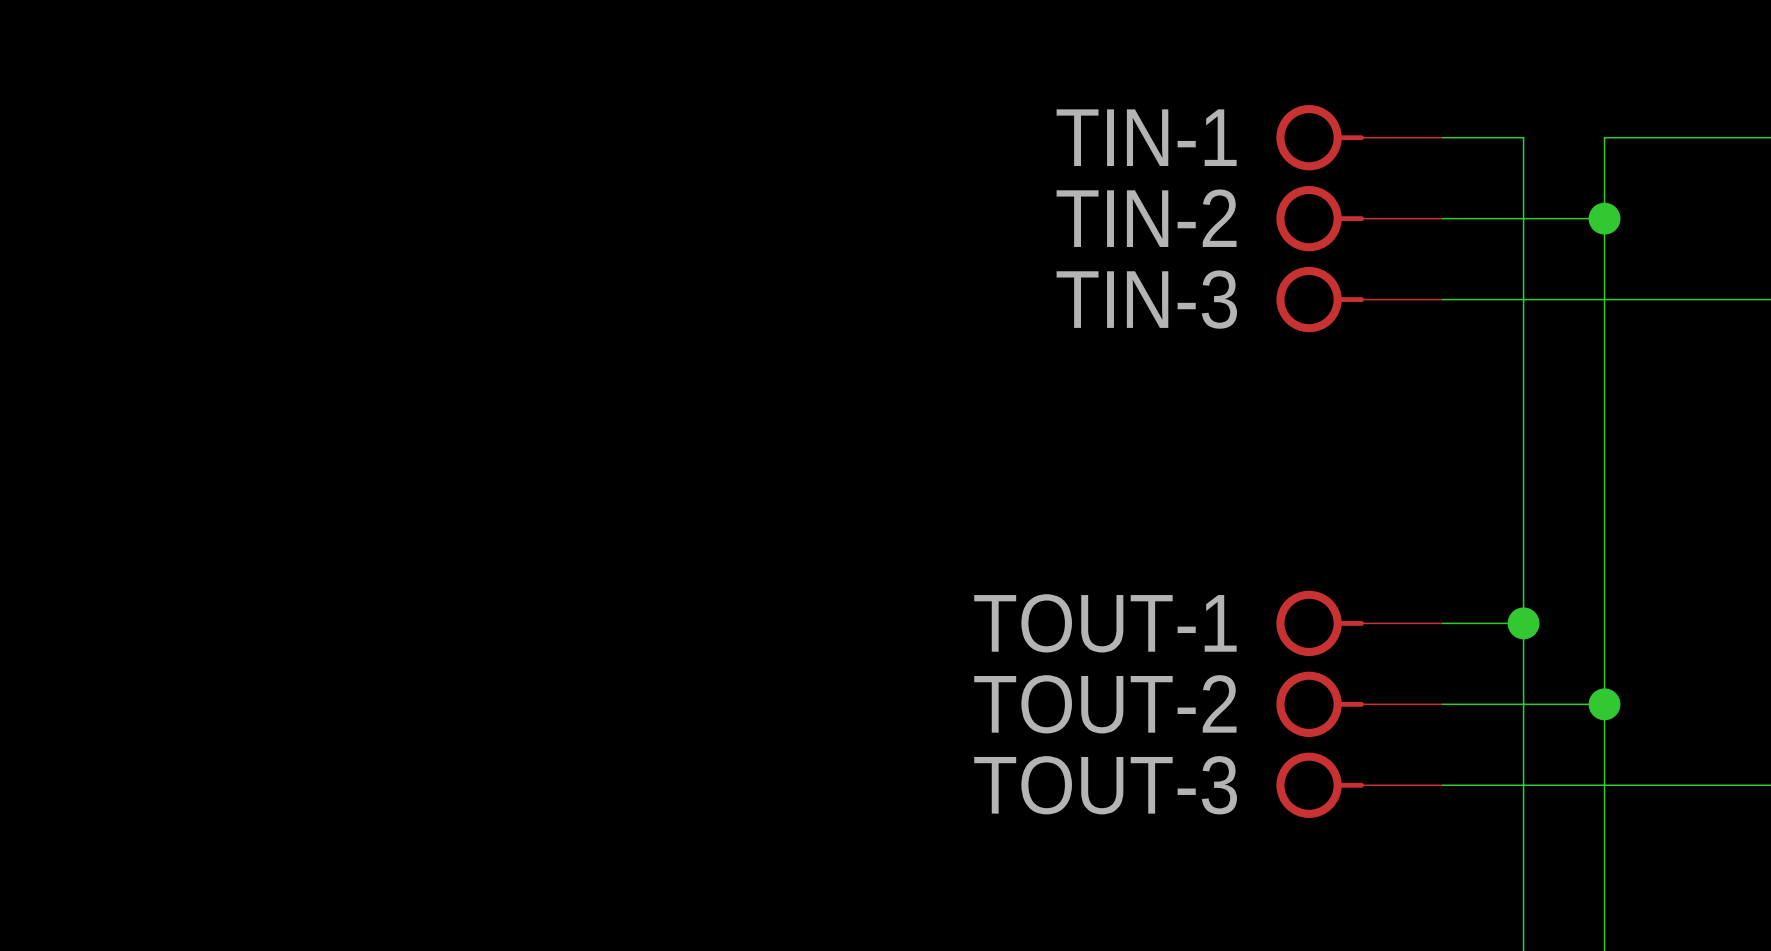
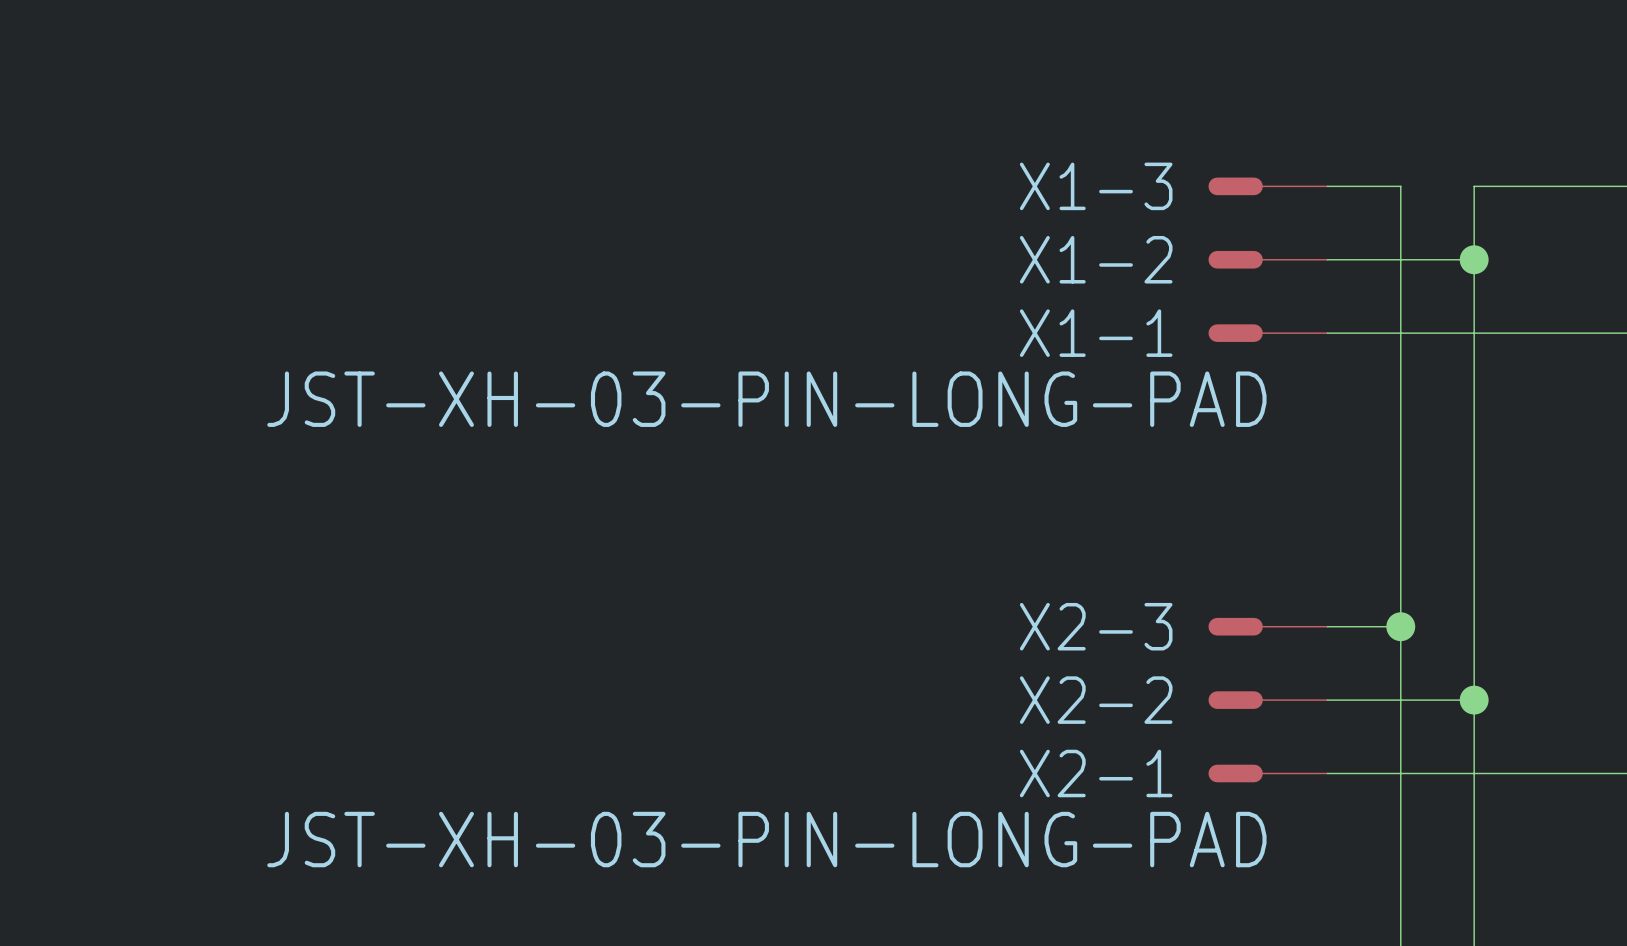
TIN-1: (1359, 137) -> none
X1-3: none -> (1267, 186)
TIN-2: (1359, 218) -> none
X1-2: none -> (1267, 259)
TIN-3: (1359, 299) -> none
X1-1: none -> JST-XH-03-PIN-LONG-PAD (1267, 333)
TOUT-1: (1359, 623) -> none
X2-3: none -> (1267, 626)
TOUT-2: (1359, 704) -> none
X2-2: none -> (1267, 700)
TOUT-3: (1359, 785) -> none
X2-1: none -> JST-XH-03-PIN-LONG-PAD (1267, 773)

